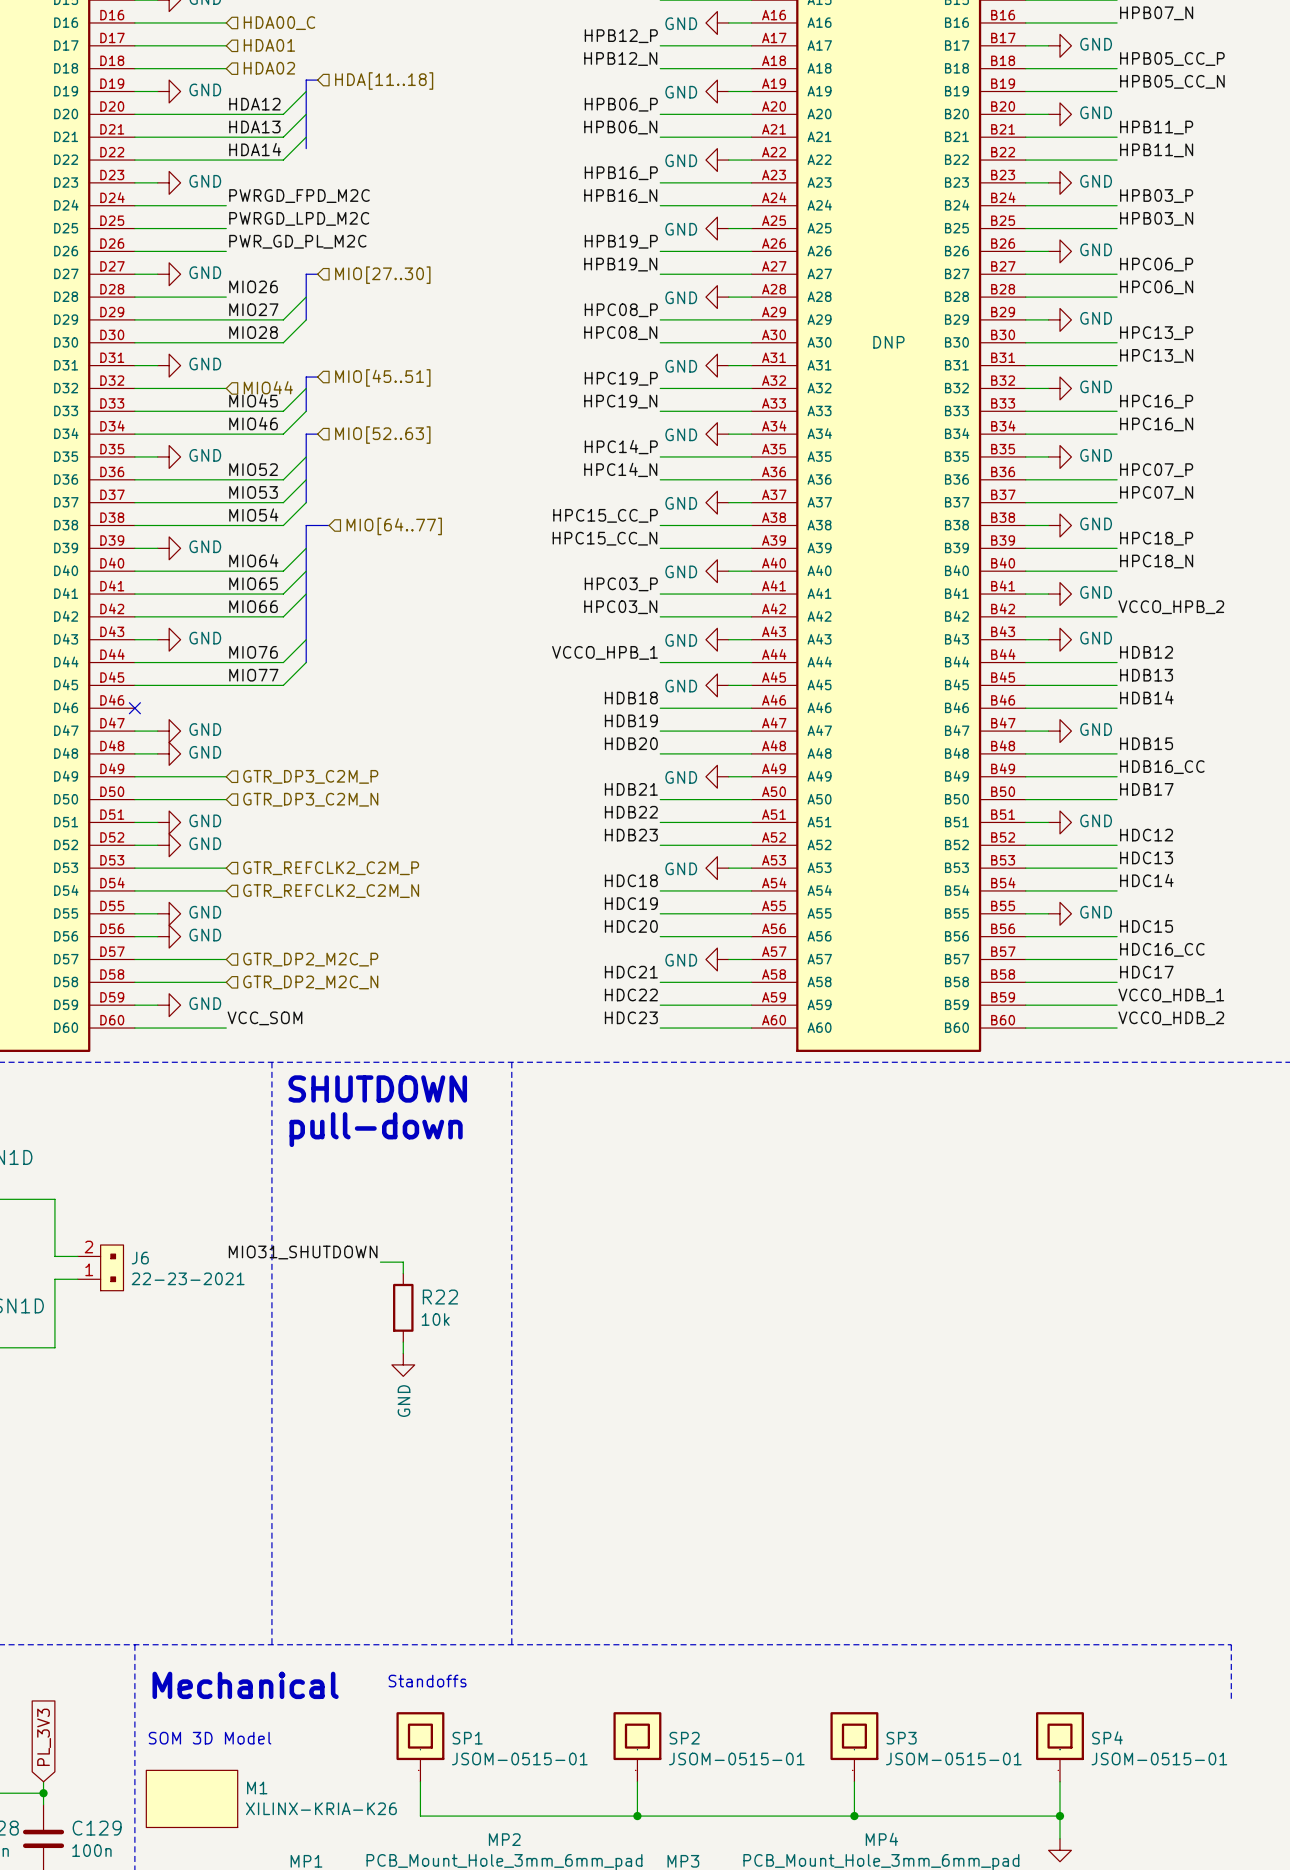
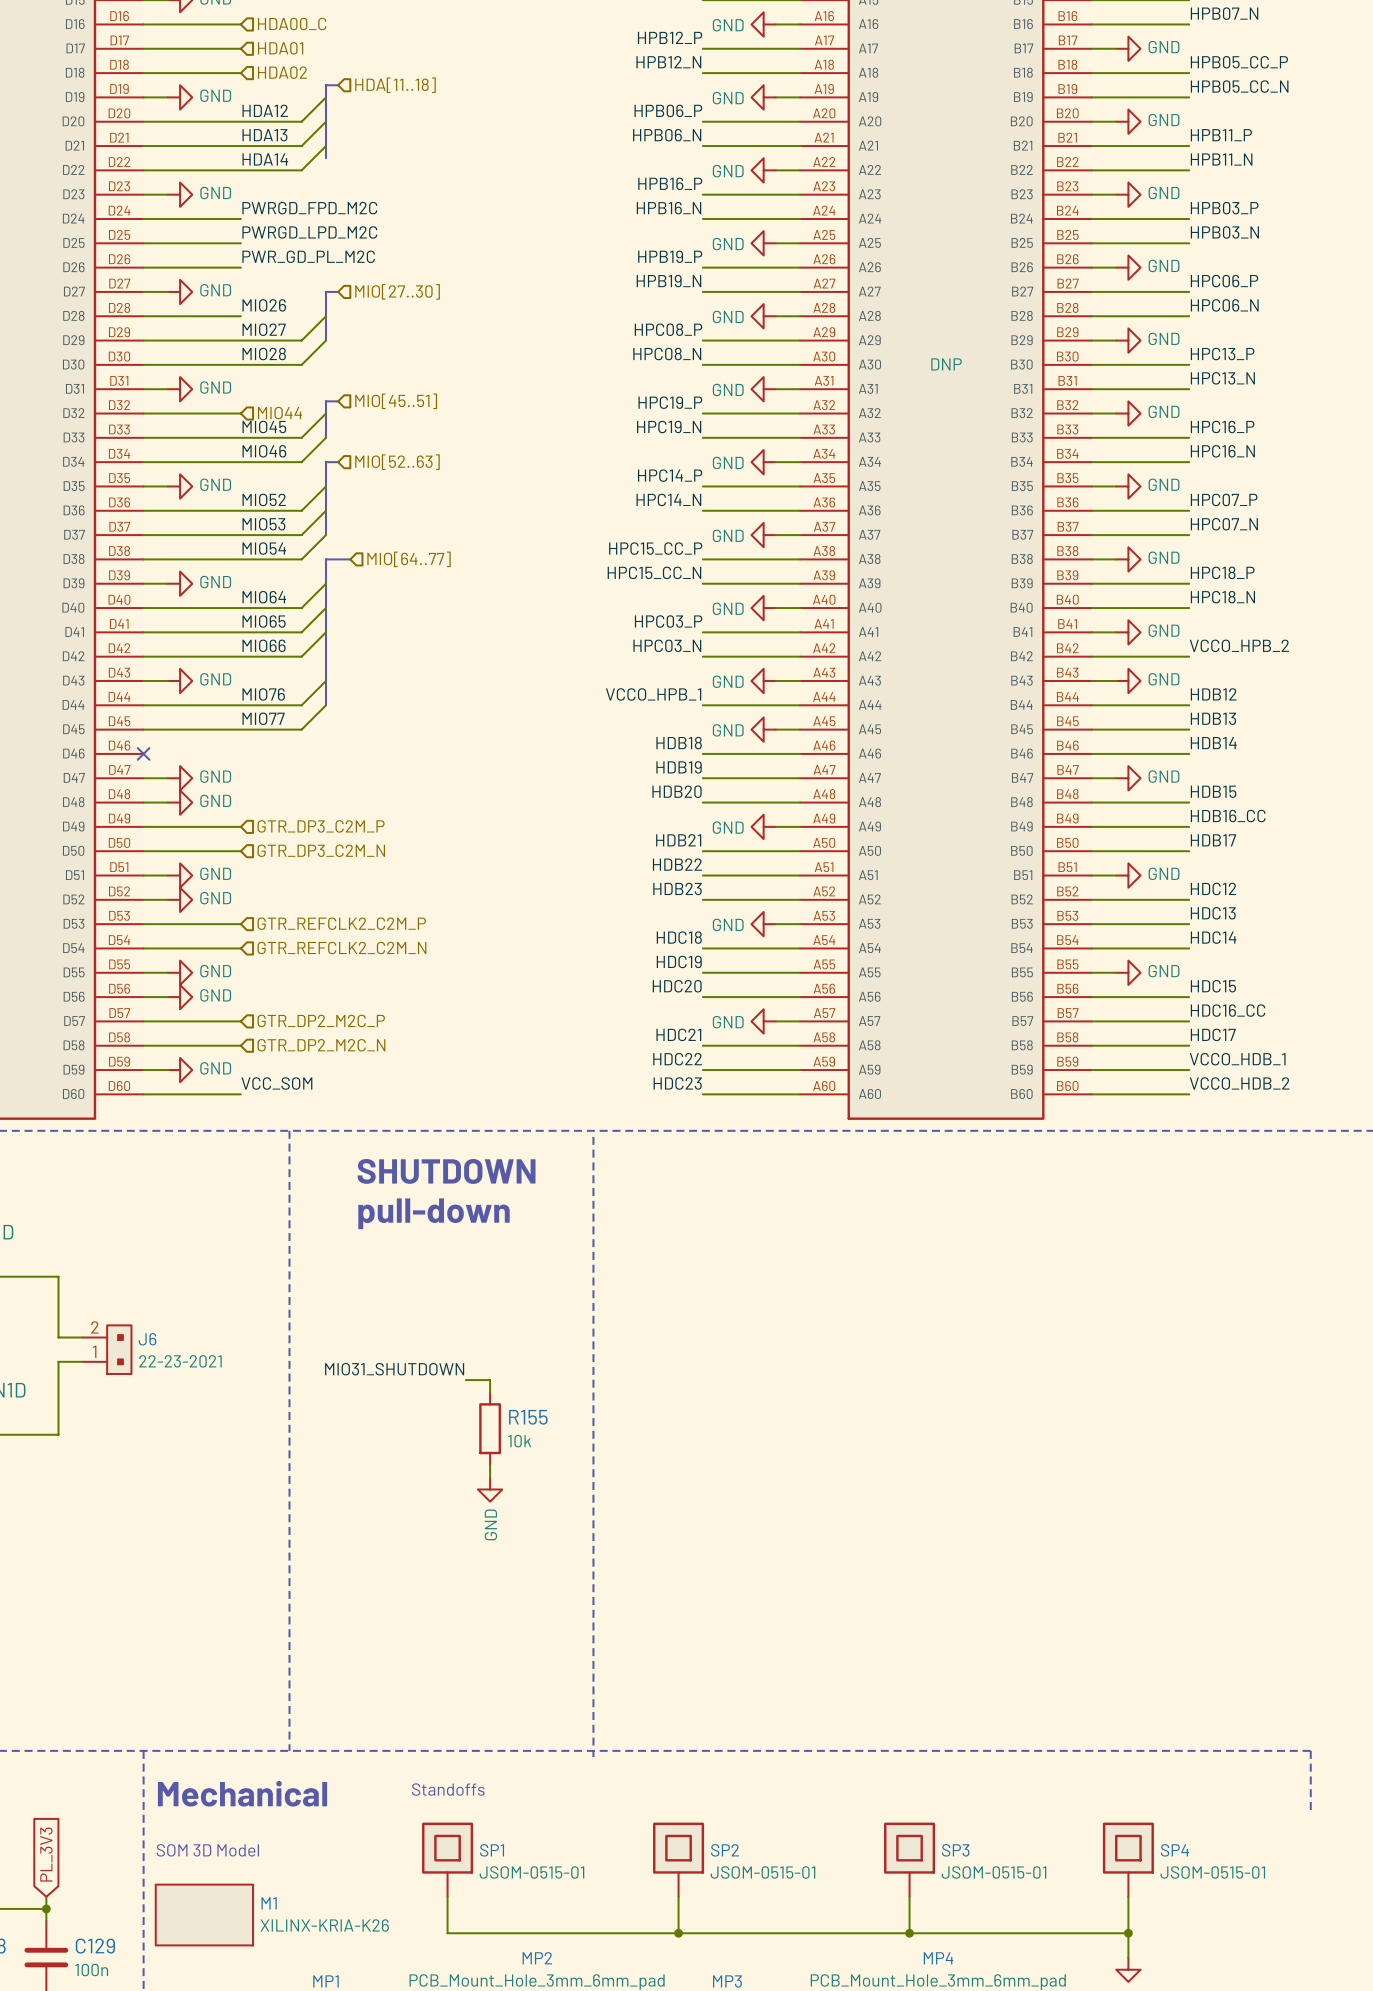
line: (511, 1062) (511, 1644) -> (593, 1136) (593, 1756)
text position: SHUTDOWN (377, 1088) -> SHUTDOWN (446, 1171)
text position: pull-down (376, 1129) -> pull-down (434, 1213)
label position: MIO31_SHUTDOWN (303, 1252) -> MIO31_SHUTDOWN (394, 1369)
wire: (380, 1262) (403, 1262) (403, 1273) -> (465, 1380) (490, 1380) (490, 1392)
R22: (403, 1307) -> none
wire: (403, 1342) (403, 1353) -> (490, 1465) (490, 1477)
R155: none -> (490, 1428)
power symbol position: GND (403, 1364) -> GND (490, 1489)

